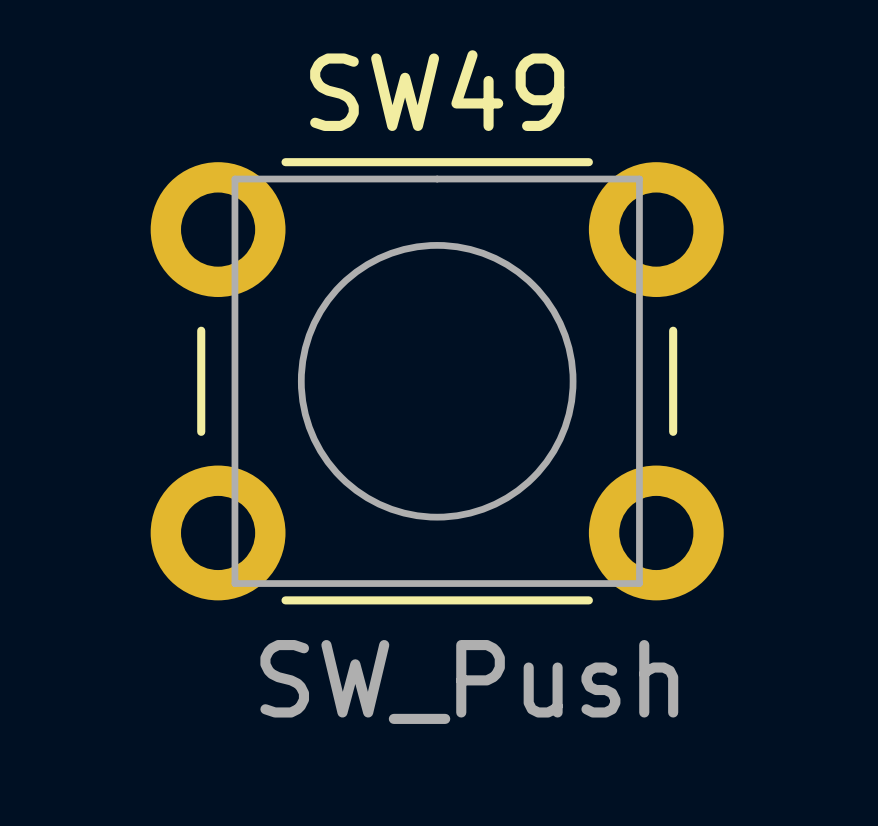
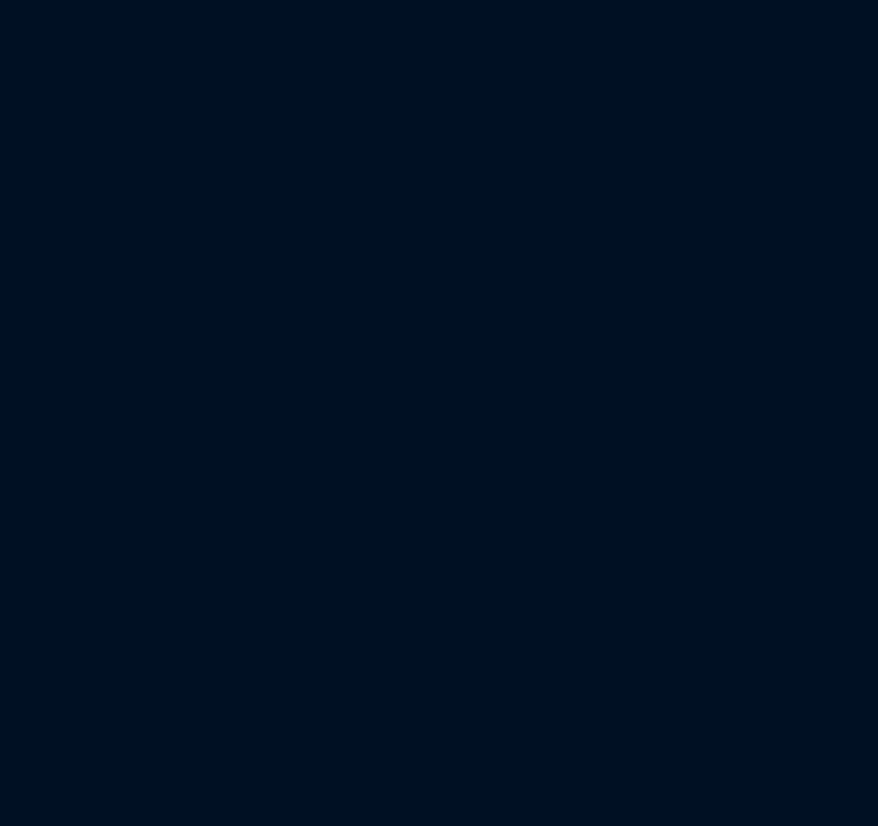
SW49: SW_Push (437, 381) -> none

